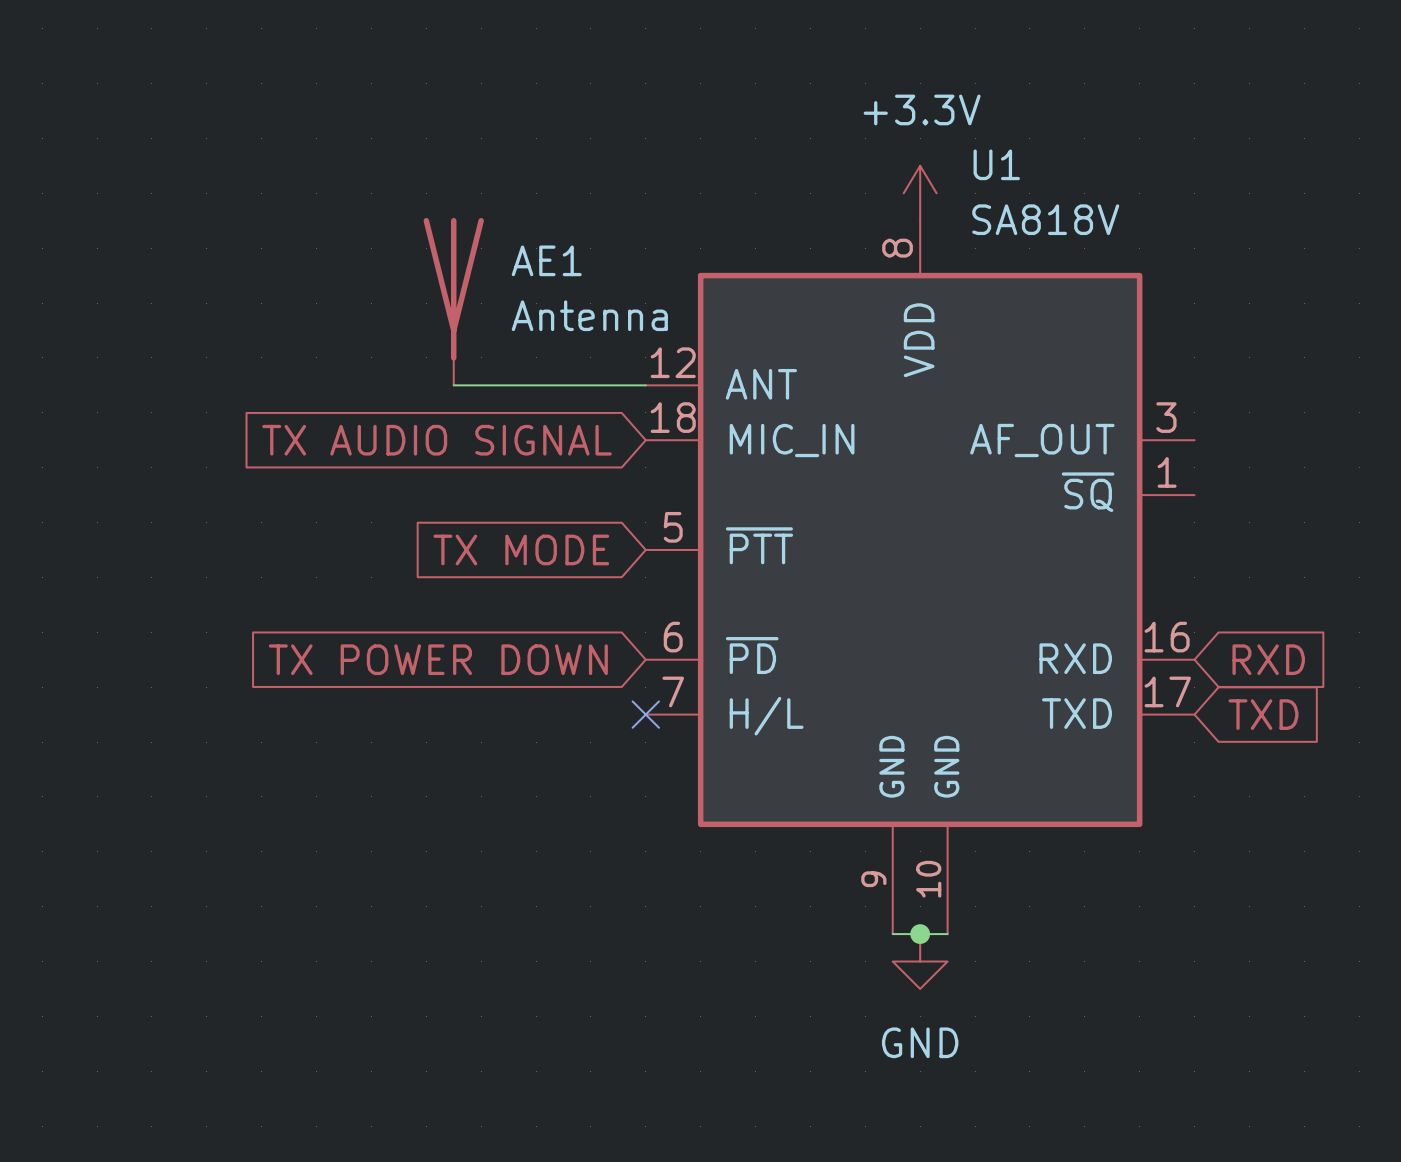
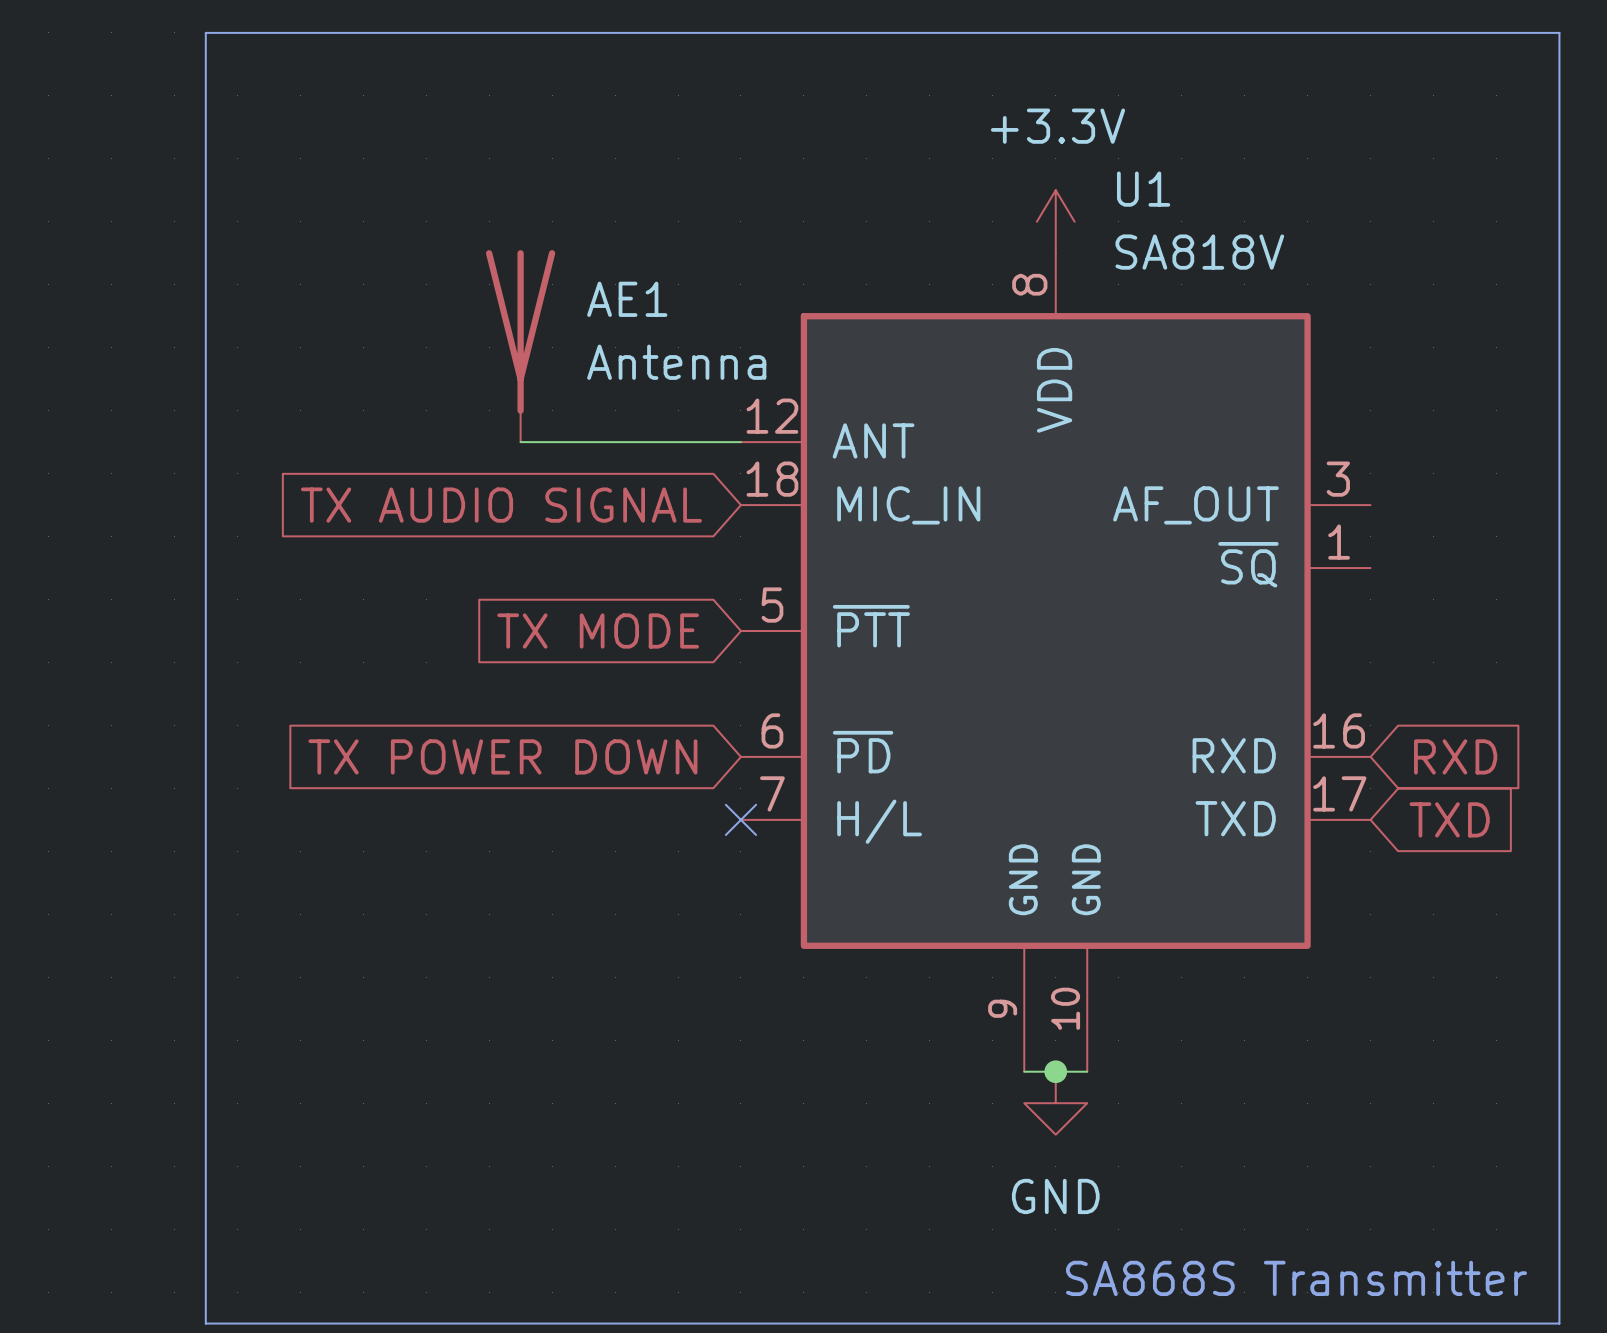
line: none -> (205, 32) (1559, 32) (1559, 1323) (205, 1323) (205, 32)
text: none -> SA868S Transmitter (1296, 1278)

